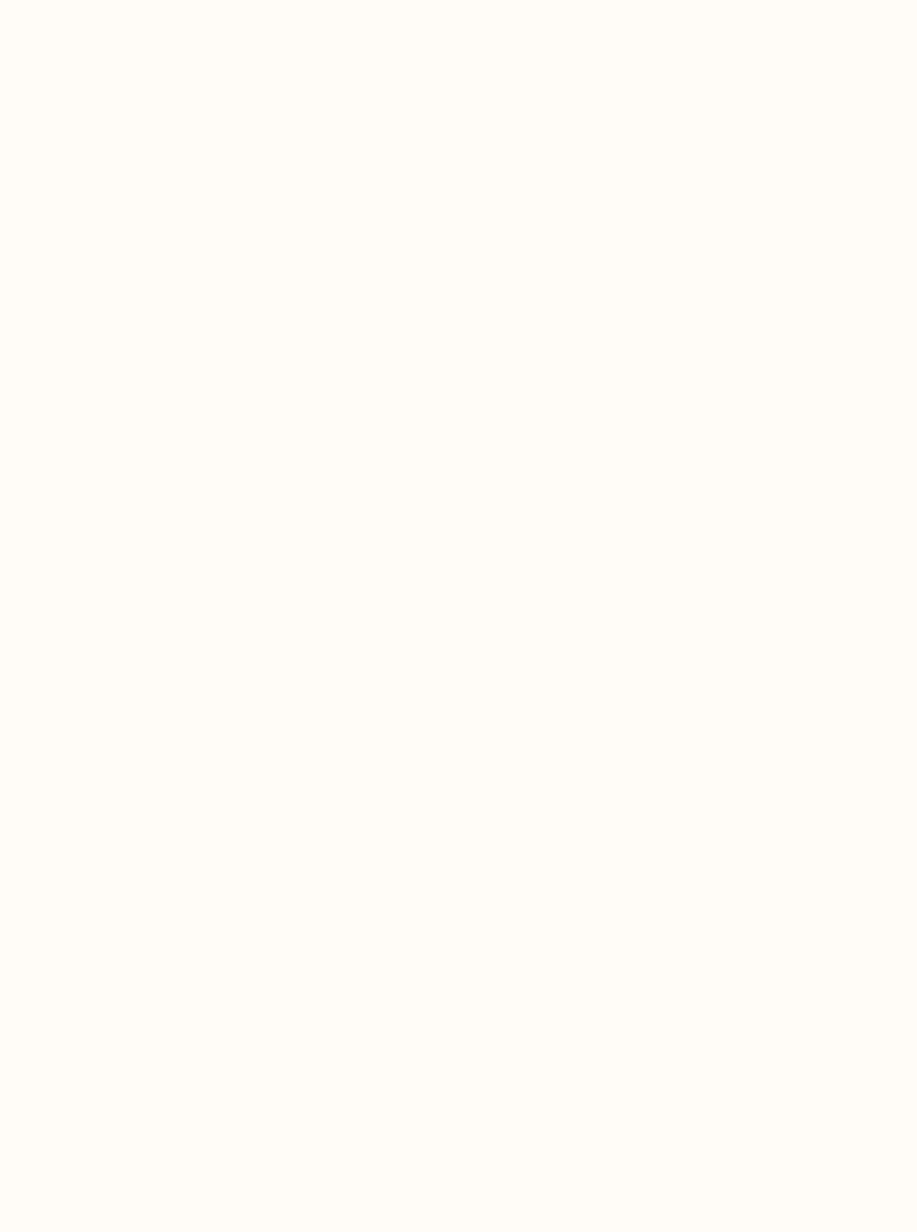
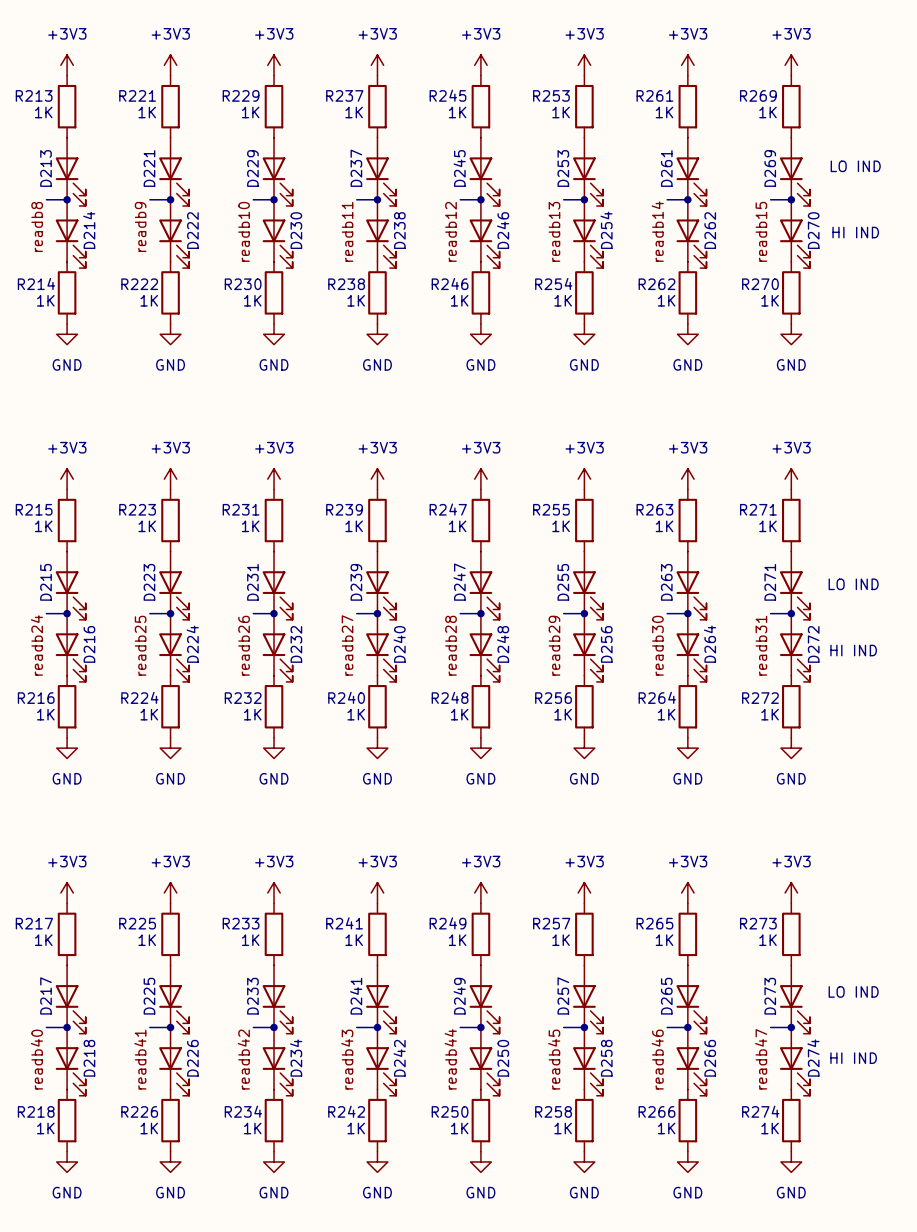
power symbol: none -> +3V3 (67, 65)
power symbol: none -> +3V3 (170, 65)
power symbol: none -> +3V3 (274, 65)
power symbol: none -> +3V3 (377, 65)
power symbol: none -> +3V3 (480, 65)
power symbol: none -> +3V3 (584, 65)
power symbol: none -> +3V3 (687, 65)
power symbol: none -> +3V3 (791, 65)
R213: none -> 1K (67, 106)
R221: none -> 1K (170, 106)
R229: none -> 1K (274, 106)
R237: none -> 1K (377, 106)
R245: none -> 1K (480, 106)
R253: none -> 1K (584, 106)
R261: none -> 1K (687, 106)
R269: none -> 1K (791, 106)
text: none -> LO IND (855, 166)
D213: none -> (70, 171)
D221: none -> (174, 171)
D229: none -> (277, 171)
D237: none -> (381, 171)
D245: none -> (484, 171)
D253: none -> (588, 171)
D261: none -> (691, 171)
D269: none -> (794, 171)
wire: none -> (46, 199) (67, 199)
junction: none -> (67, 199)
wire: none -> (149, 199) (170, 199)
junction: none -> (170, 199)
wire: none -> (253, 199) (274, 199)
junction: none -> (274, 199)
wire: none -> (356, 199) (377, 199)
junction: none -> (377, 199)
wire: none -> (460, 199) (480, 199)
junction: none -> (480, 199)
wire: none -> (563, 199) (584, 199)
junction: none -> (584, 199)
wire: none -> (667, 199) (687, 199)
junction: none -> (687, 199)
wire: none -> (770, 199) (791, 199)
junction: none -> (791, 199)
label: none -> readb8 (37, 226)
label: none -> readb9 (140, 226)
label: none -> readb10 (244, 231)
label: none -> readb11 (347, 231)
label: none -> readb12 (451, 231)
label: none -> readb13 (554, 231)
label: none -> readb14 (657, 231)
label: none -> readb15 (761, 231)
text: none -> HI IND (855, 232)
D214: none -> (70, 233)
D222: none -> (174, 233)
D230: none -> (277, 233)
D238: none -> (381, 233)
D246: none -> (484, 233)
D254: none -> (588, 233)
D262: none -> (691, 233)
D270: none -> (794, 233)
R214: none -> 1K (67, 292)
R222: none -> 1K (170, 292)
R230: none -> 1K (274, 292)
R238: none -> 1K (377, 292)
R246: none -> 1K (480, 292)
R254: none -> 1K (584, 292)
R262: none -> 1K (687, 292)
R270: none -> 1K (791, 292)
power symbol: none -> GND (67, 334)
power symbol: none -> GND (170, 334)
power symbol: none -> GND (274, 334)
power symbol: none -> GND (377, 334)
power symbol: none -> GND (480, 334)
power symbol: none -> GND (584, 334)
power symbol: none -> GND (687, 334)
power symbol: none -> GND (791, 334)
power symbol: none -> +3V3 (67, 479)
power symbol: none -> +3V3 (170, 479)
power symbol: none -> +3V3 (274, 479)
power symbol: none -> +3V3 (377, 479)
power symbol: none -> +3V3 (480, 479)
power symbol: none -> +3V3 (584, 479)
power symbol: none -> +3V3 (687, 479)
power symbol: none -> +3V3 (791, 479)
R215: none -> 1K (67, 520)
R223: none -> 1K (170, 520)
R231: none -> 1K (274, 520)
R239: none -> 1K (377, 520)
R247: none -> 1K (480, 520)
R255: none -> 1K (584, 520)
R263: none -> 1K (687, 520)
R271: none -> 1K (791, 520)
text: none -> LO IND (853, 584)
D215: none -> (70, 585)
D223: none -> (174, 585)
D231: none -> (277, 585)
D239: none -> (381, 585)
D247: none -> (484, 585)
D255: none -> (588, 585)
D263: none -> (691, 585)
D271: none -> (794, 585)
wire: none -> (46, 613) (67, 613)
junction: none -> (67, 613)
wire: none -> (149, 613) (170, 613)
junction: none -> (170, 613)
wire: none -> (253, 613) (274, 613)
junction: none -> (274, 613)
wire: none -> (356, 613) (377, 613)
junction: none -> (377, 613)
wire: none -> (460, 613) (480, 613)
junction: none -> (480, 613)
wire: none -> (563, 613) (584, 613)
junction: none -> (584, 613)
wire: none -> (667, 613) (687, 613)
junction: none -> (687, 613)
wire: none -> (770, 613) (791, 613)
junction: none -> (791, 613)
label: none -> readb24 (36, 645)
label: none -> readb25 (140, 645)
label: none -> readb26 (244, 645)
label: none -> readb27 (347, 645)
label: none -> readb28 (451, 645)
label: none -> readb29 (554, 645)
label: none -> readb30 (657, 645)
label: none -> readb31 (761, 645)
D216: none -> (70, 647)
D224: none -> (174, 647)
D232: none -> (277, 647)
D240: none -> (381, 647)
D248: none -> (484, 647)
D256: none -> (588, 647)
D264: none -> (691, 647)
D272: none -> (794, 647)
text: none -> HI IND (853, 650)
R216: none -> 1K (67, 706)
R224: none -> 1K (170, 706)
R232: none -> 1K (274, 706)
R240: none -> 1K (377, 706)
R248: none -> 1K (480, 706)
R256: none -> 1K (584, 706)
R264: none -> 1K (687, 706)
R272: none -> 1K (791, 706)
power symbol: none -> GND (67, 748)
power symbol: none -> GND (170, 748)
power symbol: none -> GND (274, 748)
power symbol: none -> GND (377, 748)
power symbol: none -> GND (480, 748)
power symbol: none -> GND (584, 748)
power symbol: none -> GND (687, 748)
power symbol: none -> GND (791, 748)
power symbol: none -> +3V3 (67, 892)
power symbol: none -> +3V3 (170, 892)
power symbol: none -> +3V3 (274, 892)
power symbol: none -> +3V3 (377, 892)
power symbol: none -> +3V3 (480, 892)
power symbol: none -> +3V3 (584, 892)
power symbol: none -> +3V3 (687, 892)
power symbol: none -> +3V3 (791, 892)
R217: none -> 1K (67, 934)
R225: none -> 1K (170, 934)
R233: none -> 1K (274, 934)
R241: none -> 1K (377, 934)
R249: none -> 1K (480, 934)
R257: none -> 1K (584, 934)
R265: none -> 1K (687, 934)
R273: none -> 1K (791, 934)
text: none -> LO IND (853, 991)
D217: none -> (70, 999)
D225: none -> (174, 999)
D233: none -> (277, 999)
D241: none -> (381, 999)
D249: none -> (484, 999)
D257: none -> (588, 999)
D265: none -> (691, 999)
D273: none -> (794, 999)
wire: none -> (46, 1027) (67, 1027)
junction: none -> (67, 1027)
wire: none -> (149, 1027) (170, 1027)
junction: none -> (170, 1027)
wire: none -> (253, 1027) (274, 1027)
junction: none -> (274, 1027)
wire: none -> (356, 1027) (377, 1027)
junction: none -> (377, 1027)
wire: none -> (460, 1027) (480, 1027)
junction: none -> (480, 1027)
wire: none -> (563, 1027) (584, 1027)
junction: none -> (584, 1027)
wire: none -> (667, 1027) (687, 1027)
junction: none -> (687, 1027)
wire: none -> (770, 1027) (791, 1027)
junction: none -> (791, 1027)
text: none -> HI IND (853, 1058)
label: none -> readb40 (36, 1059)
label: none -> readb41 (140, 1059)
label: none -> readb42 (243, 1059)
label: none -> readb43 (347, 1059)
label: none -> readb44 (450, 1059)
label: none -> readb45 (554, 1059)
label: none -> readb46 (657, 1059)
label: none -> readb47 (761, 1059)
D218: none -> (70, 1061)
D226: none -> (174, 1061)
D234: none -> (277, 1061)
D242: none -> (381, 1061)
D250: none -> (484, 1061)
D258: none -> (588, 1061)
D266: none -> (691, 1061)
D274: none -> (794, 1061)
R218: none -> 1K (67, 1120)
R226: none -> 1K (170, 1120)
R234: none -> 1K (274, 1120)
R242: none -> 1K (377, 1120)
R250: none -> 1K (480, 1120)
R258: none -> 1K (584, 1120)
R266: none -> 1K (687, 1120)
R274: none -> 1K (791, 1120)
power symbol: none -> GND (67, 1161)
power symbol: none -> GND (170, 1161)
power symbol: none -> GND (274, 1161)
power symbol: none -> GND (377, 1161)
power symbol: none -> GND (480, 1161)
power symbol: none -> GND (584, 1161)
power symbol: none -> GND (687, 1161)
power symbol: none -> GND (791, 1161)

